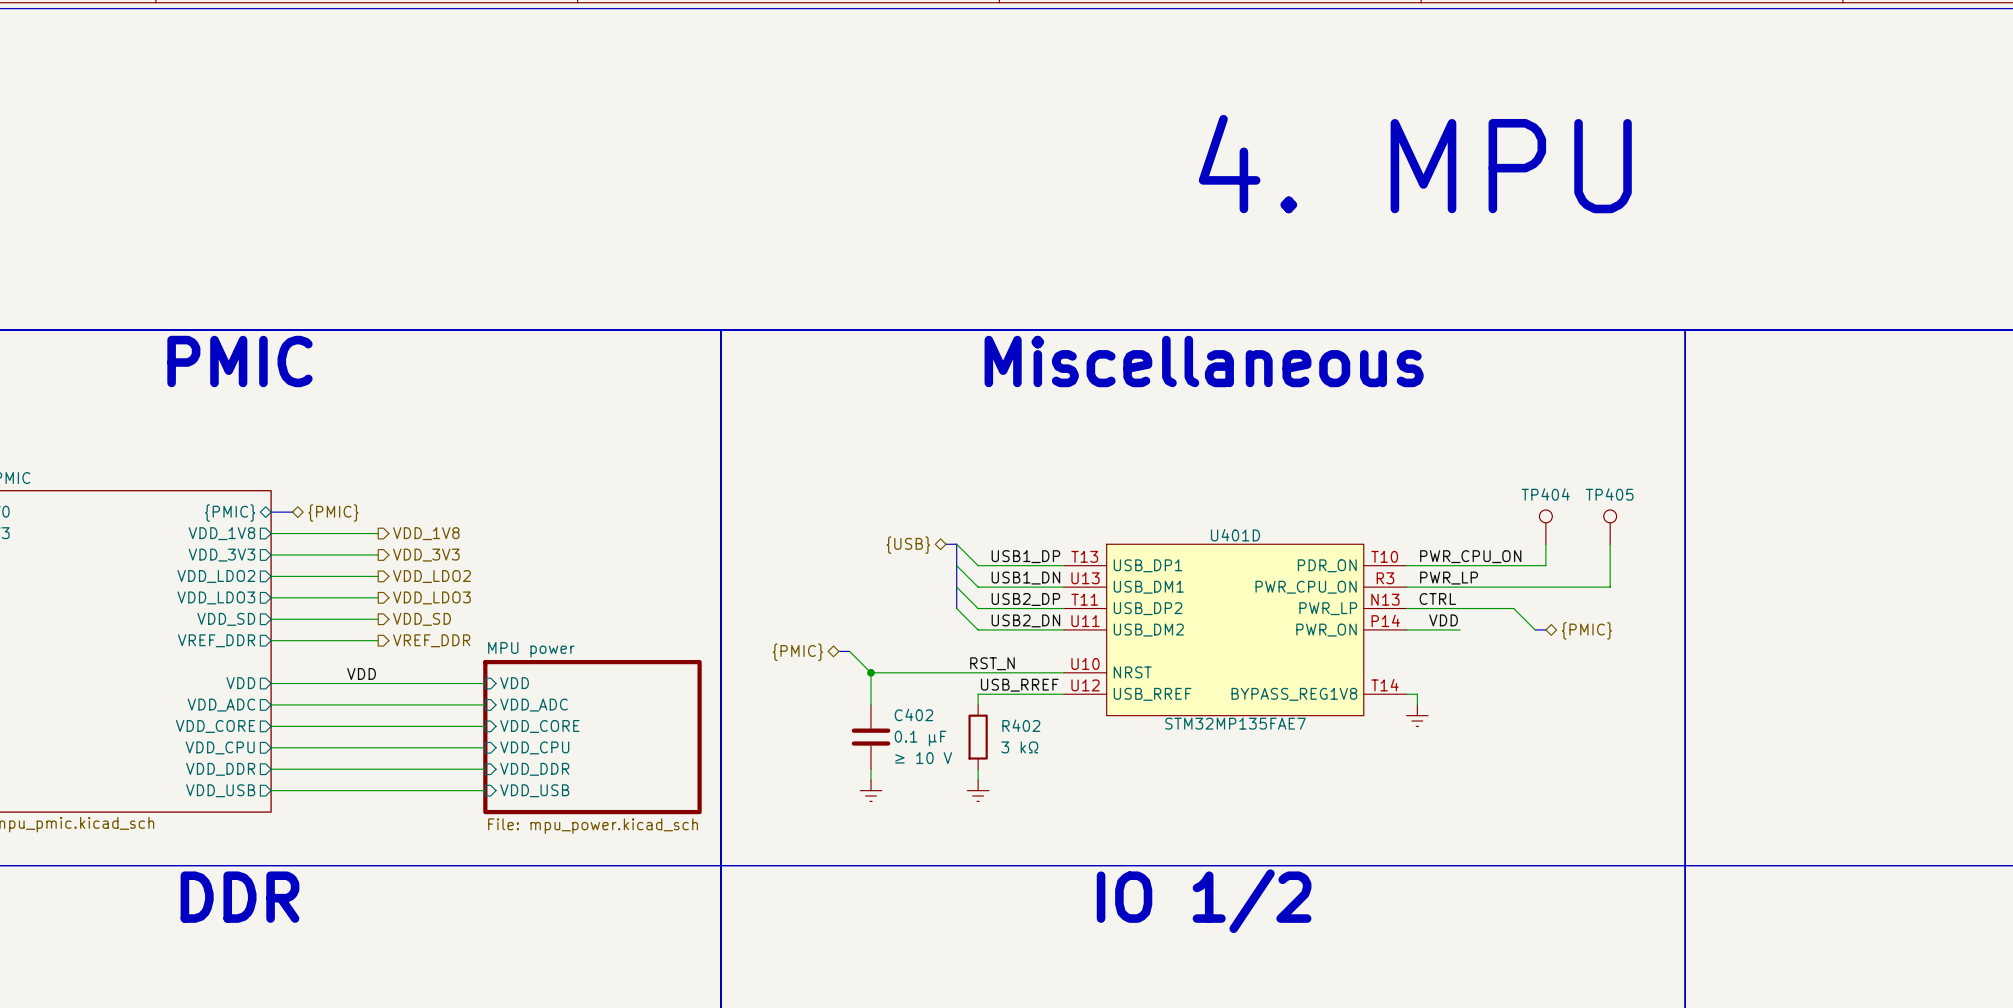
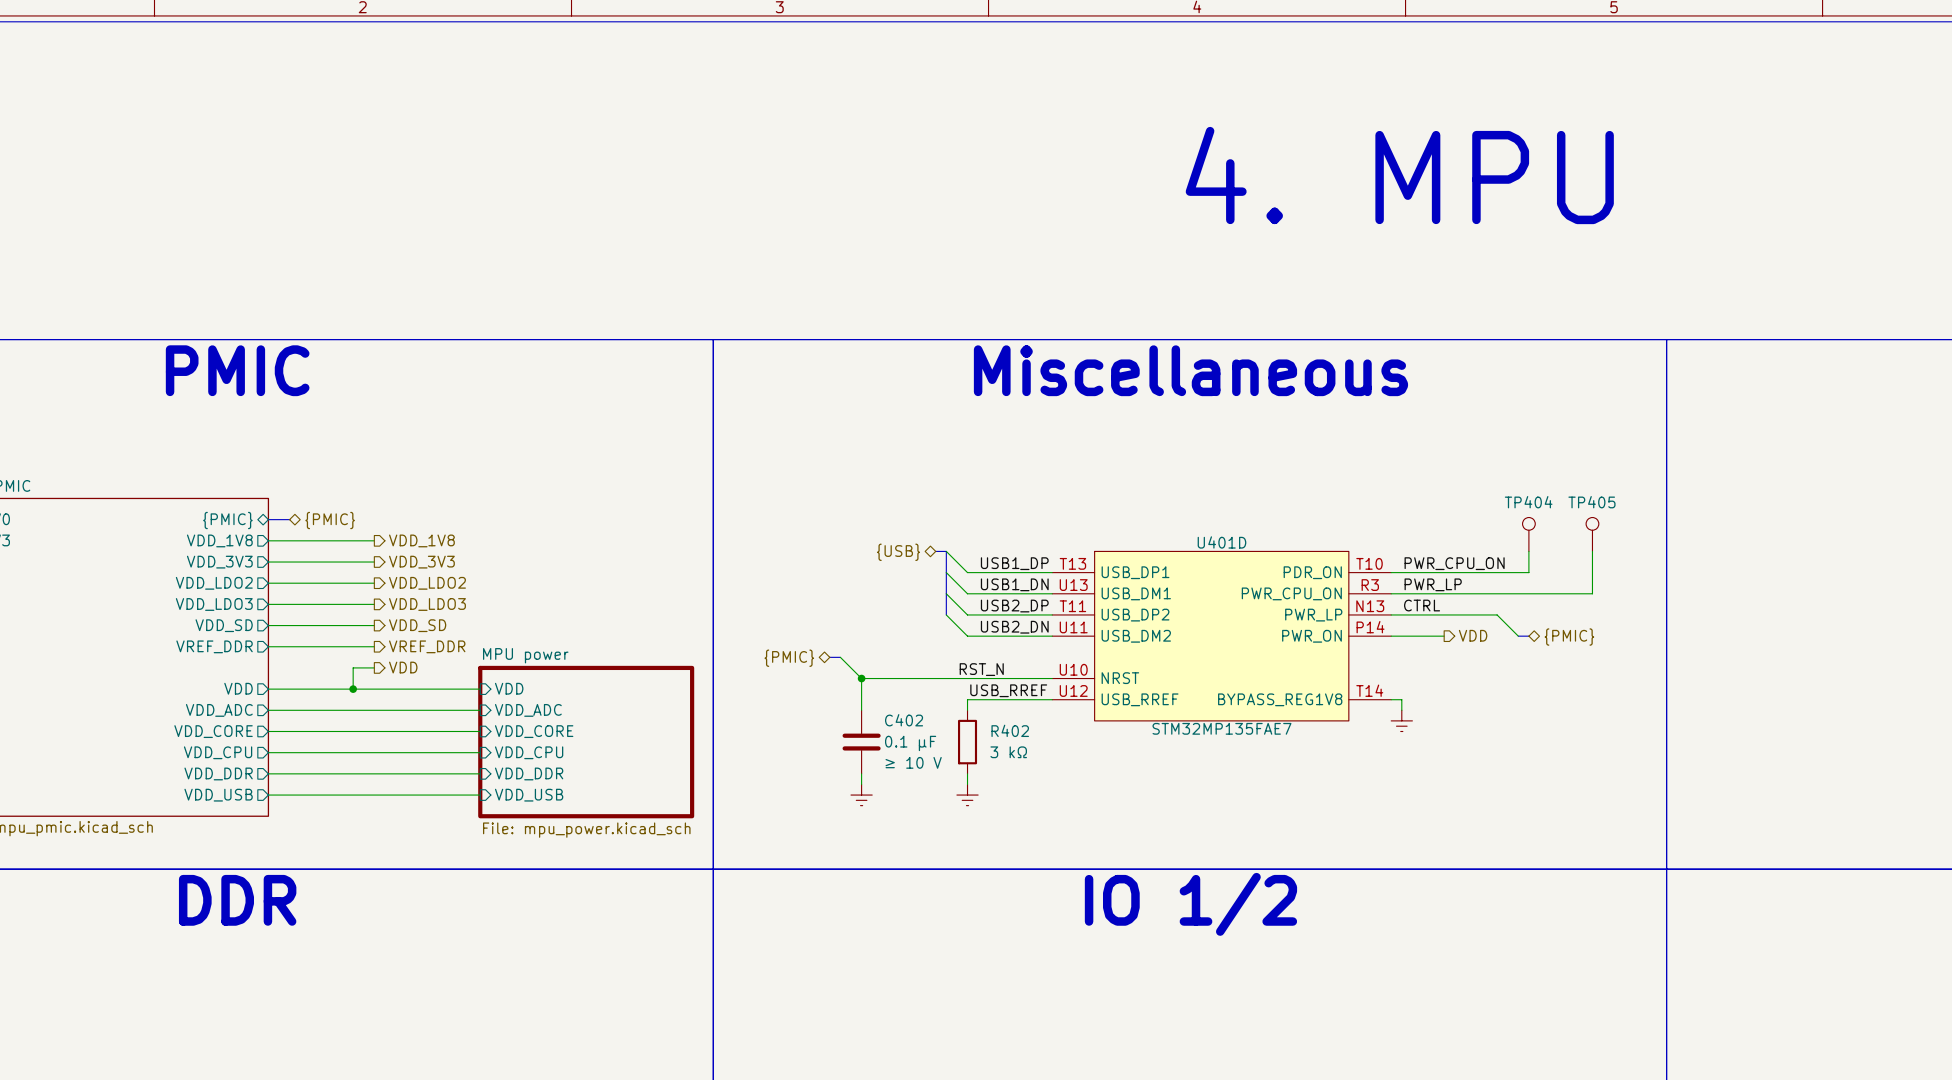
label: VDD (1443, 620) -> none
hierarchical label: none -> VDD (1473, 635)
hierarchical label: none -> VDD (403, 667)
wire: none -> (374, 667) (353, 667) (353, 689)
label: VDD (361, 673) -> none
junction: none -> (353, 689)

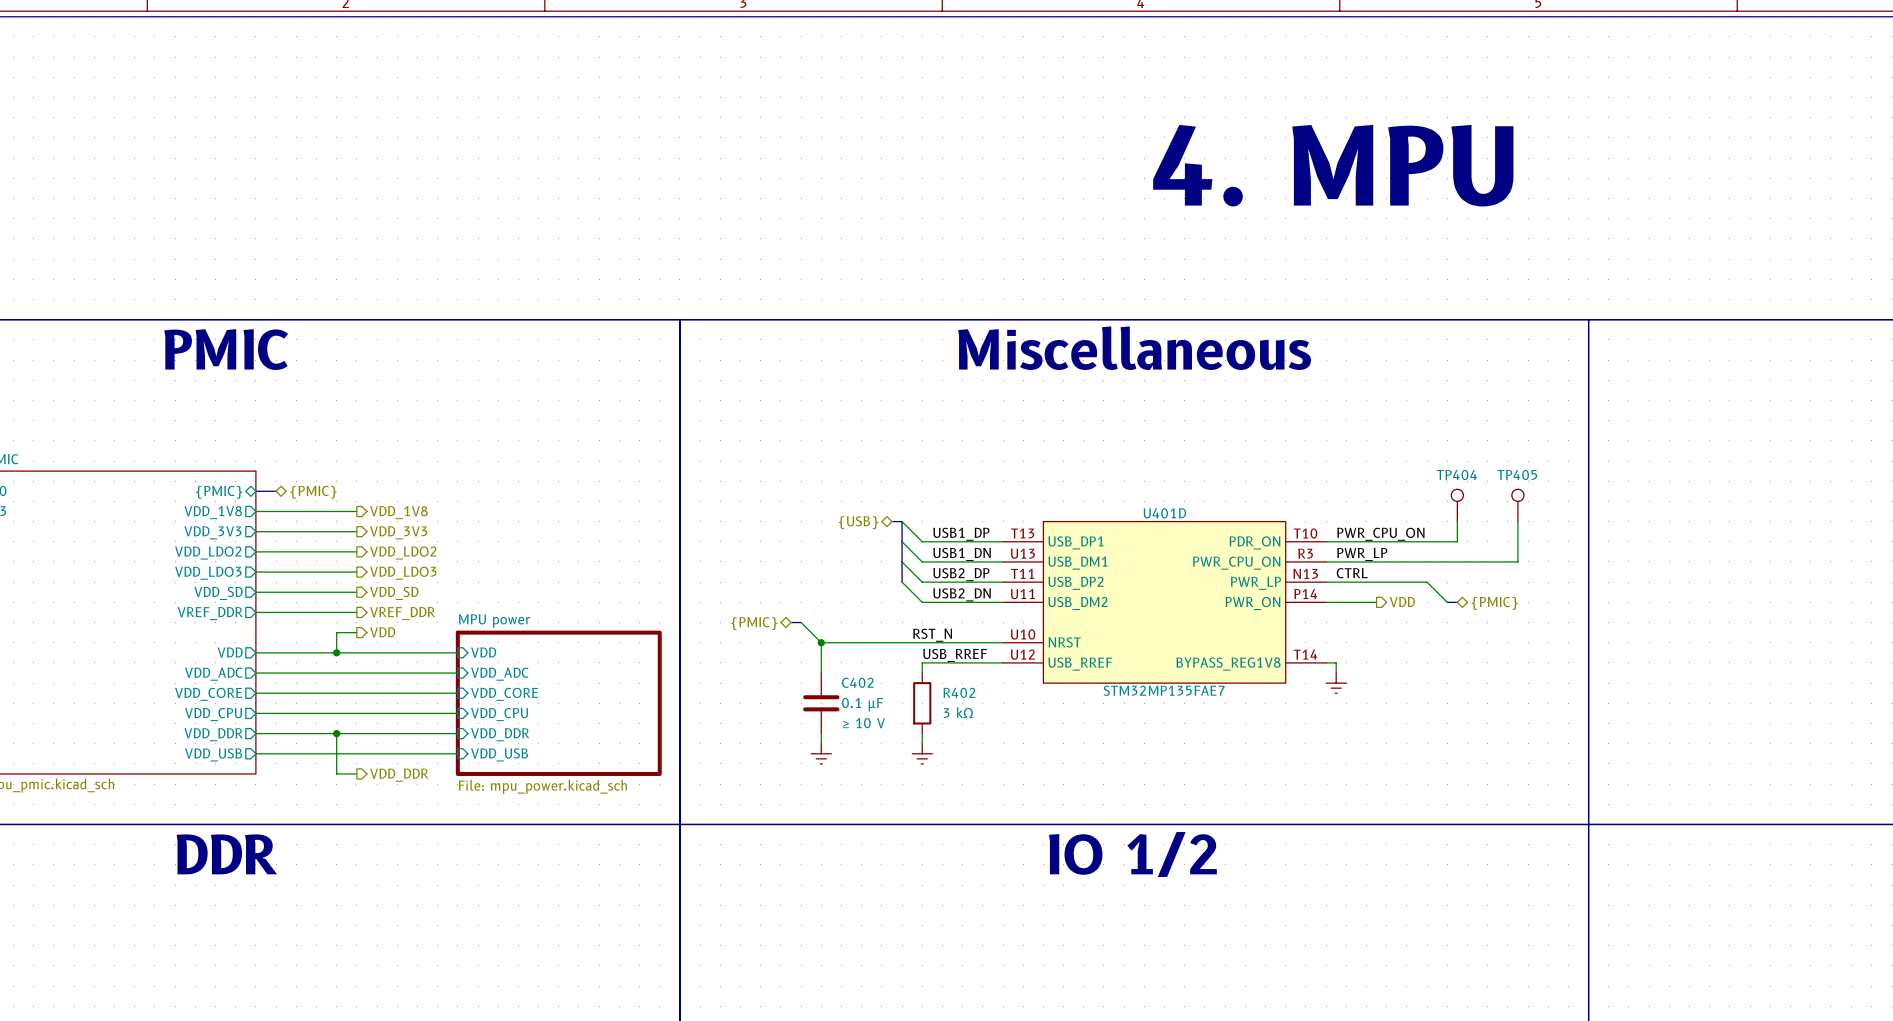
wire: none -> (336, 733) (336, 773) (356, 773)
junction: none -> (336, 733)
hierarchical label: none -> VDD_DDR (399, 775)

